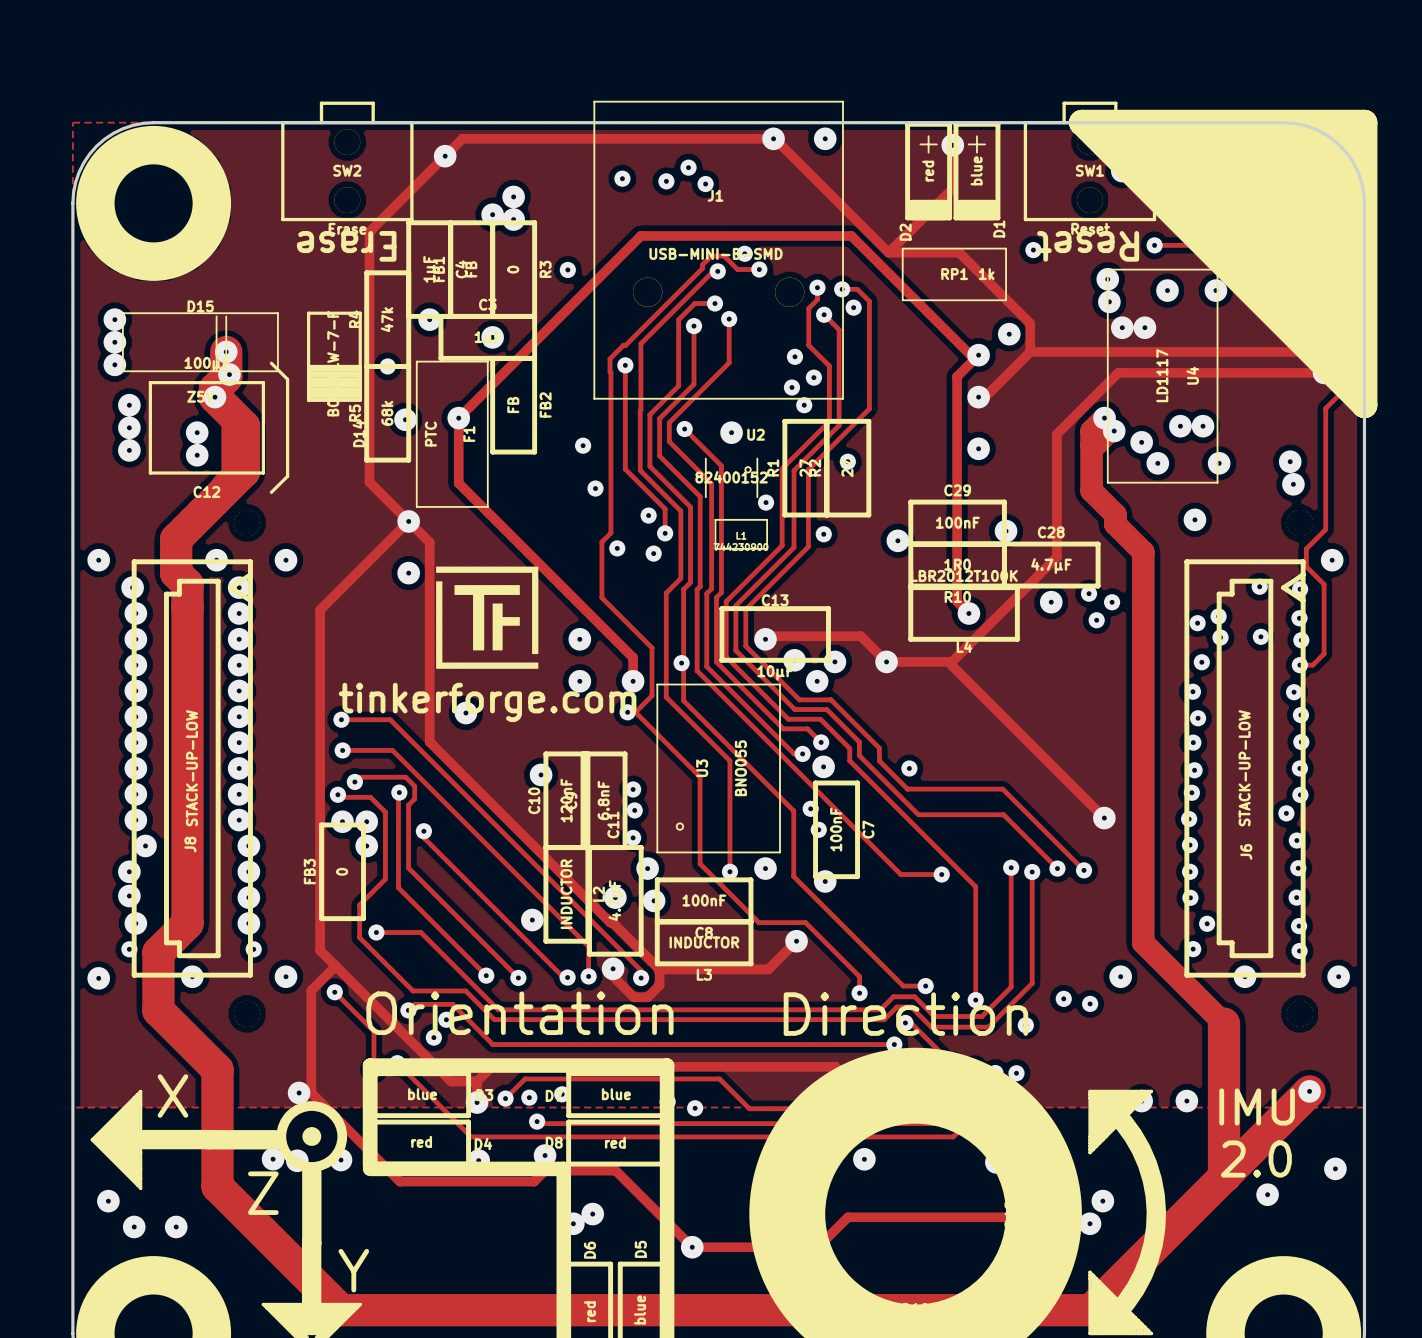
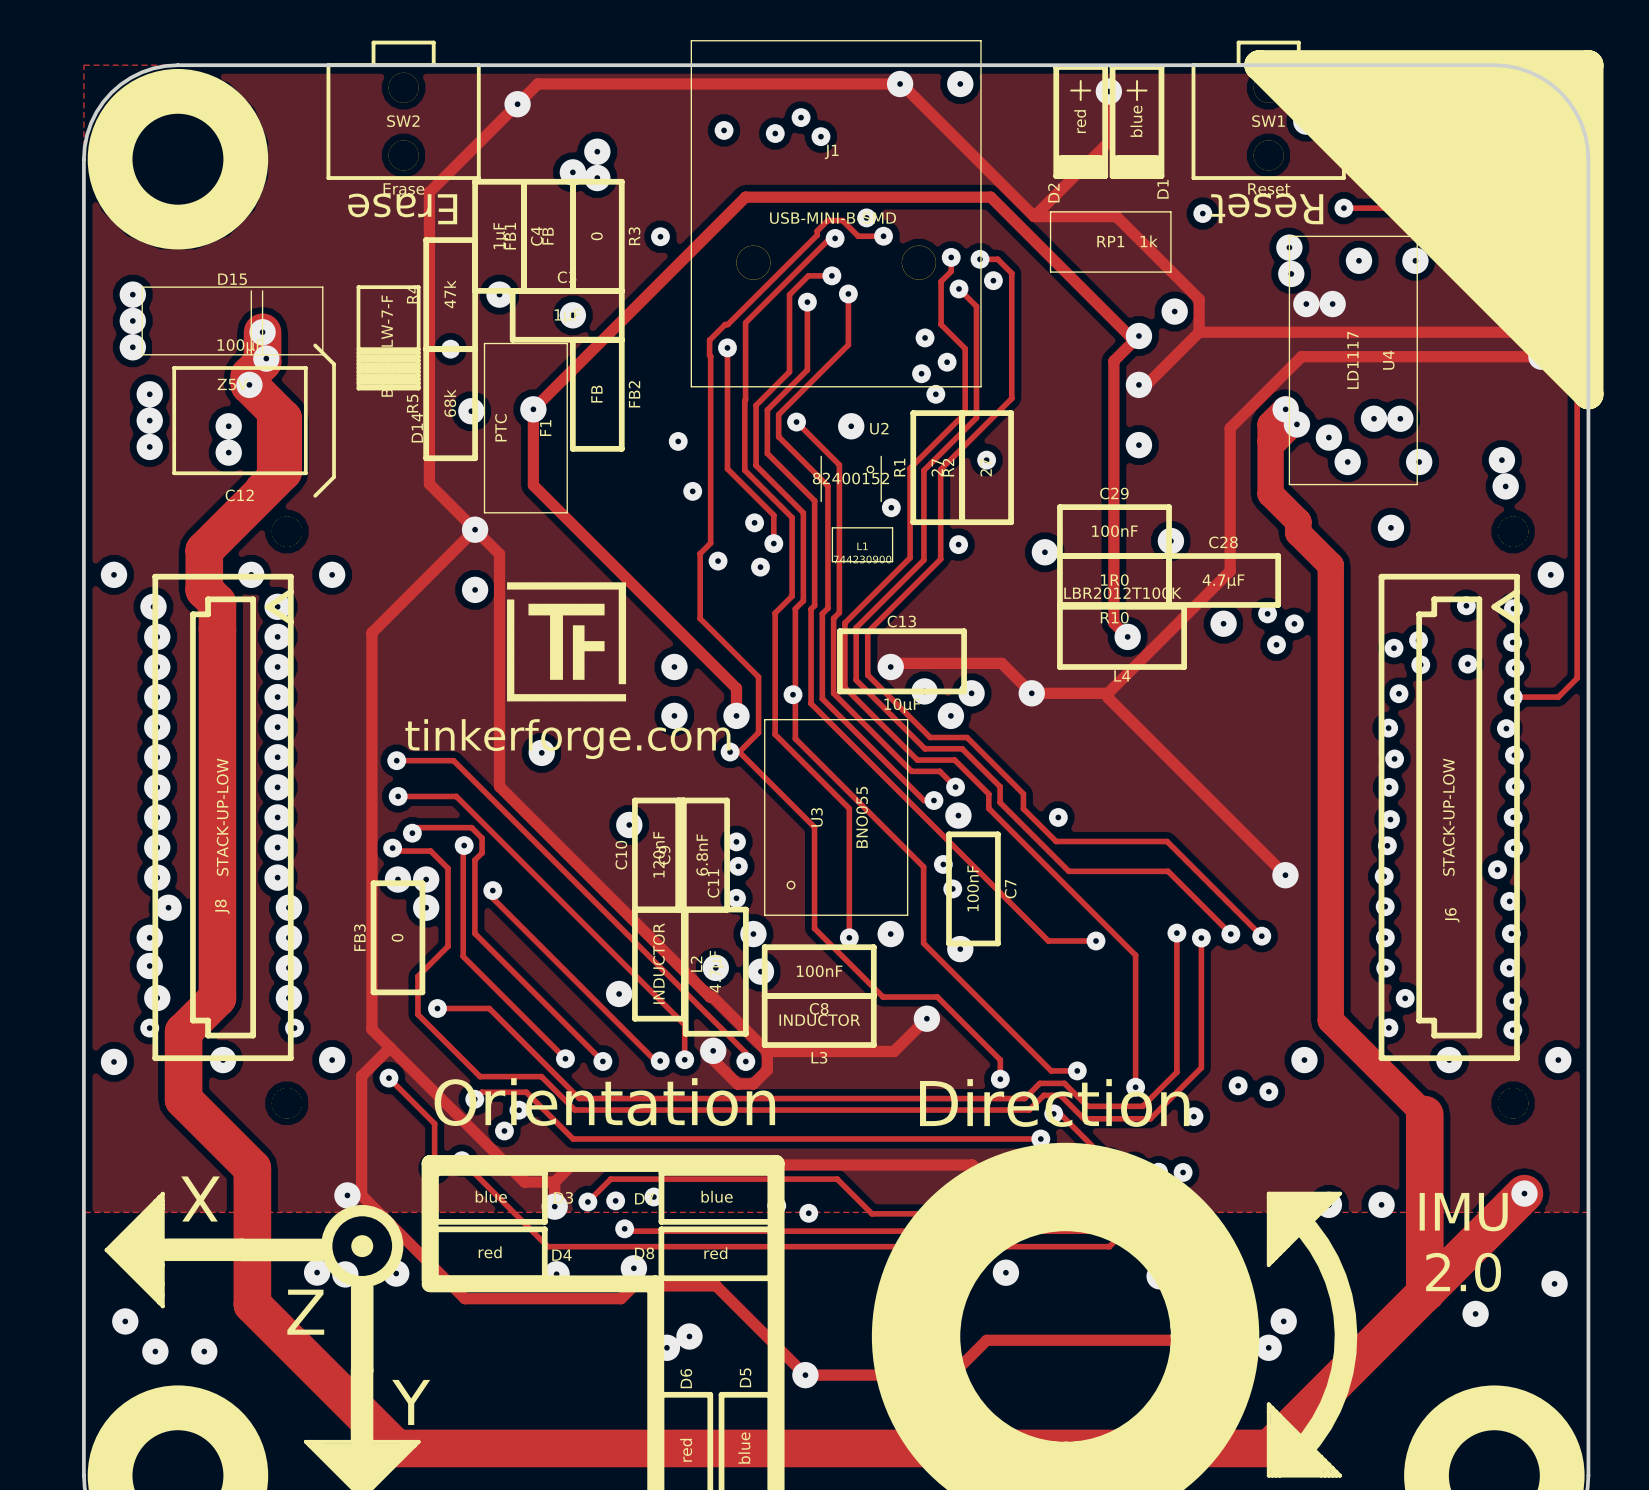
track: (1343, 324) (1343, 390) (1325, 408) (1325, 529) (1306, 548) (1306, 566) (1324, 584) (1324, 653) (1312, 665) -> (1563, 300) (1577, 313) (1577, 678) (1558, 697) (1528, 697)

